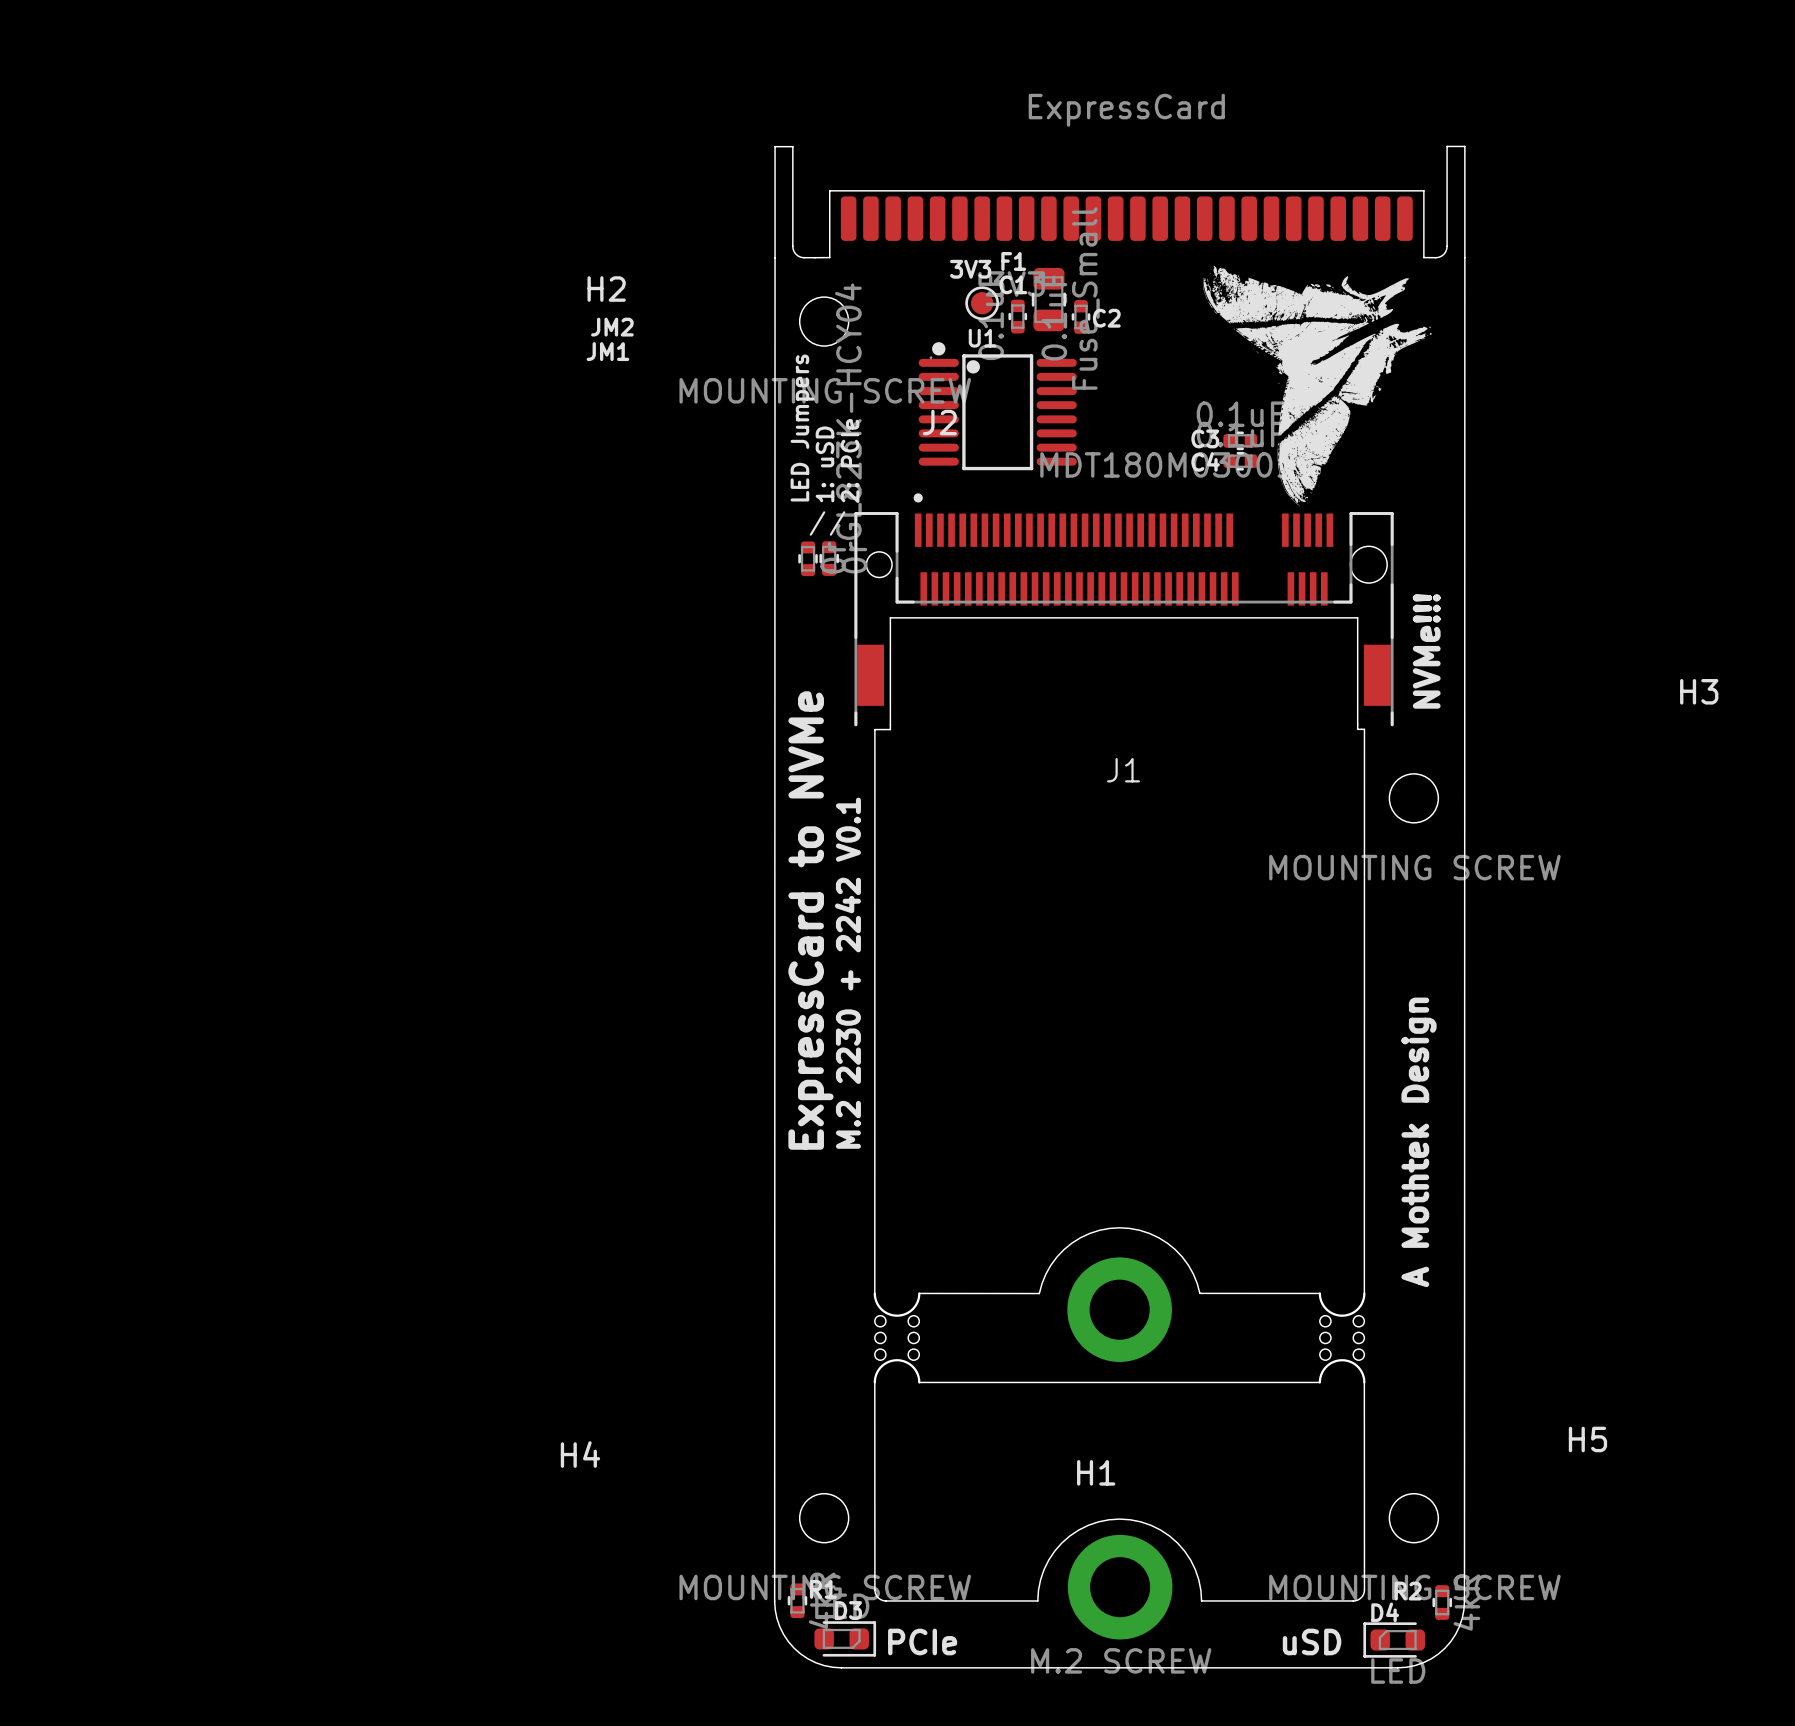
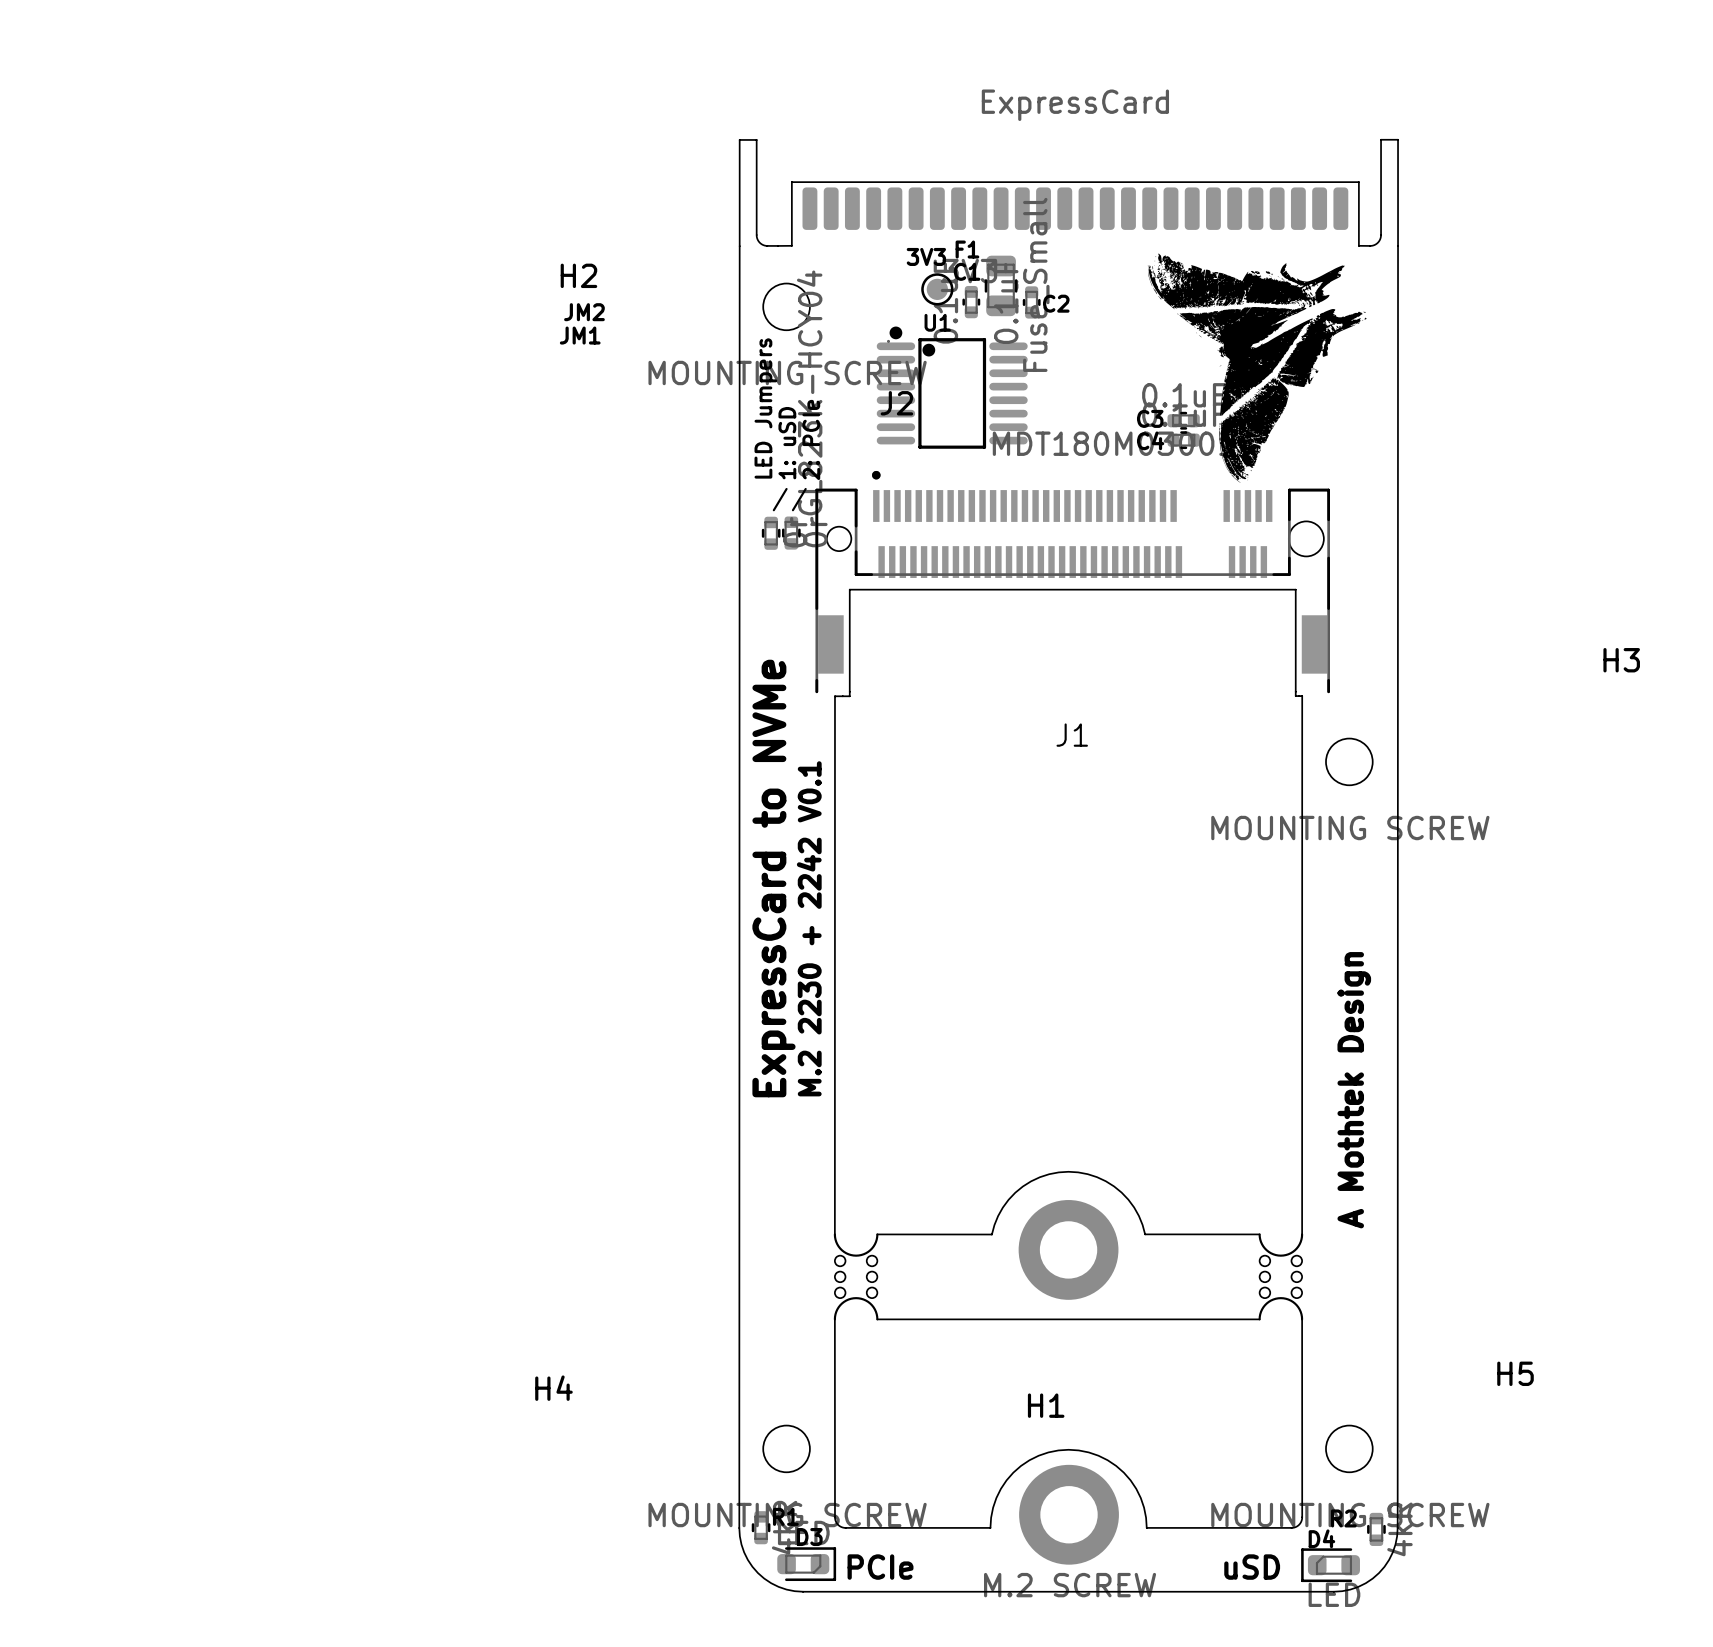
text: NVMe!!! (1426, 651) -> none

